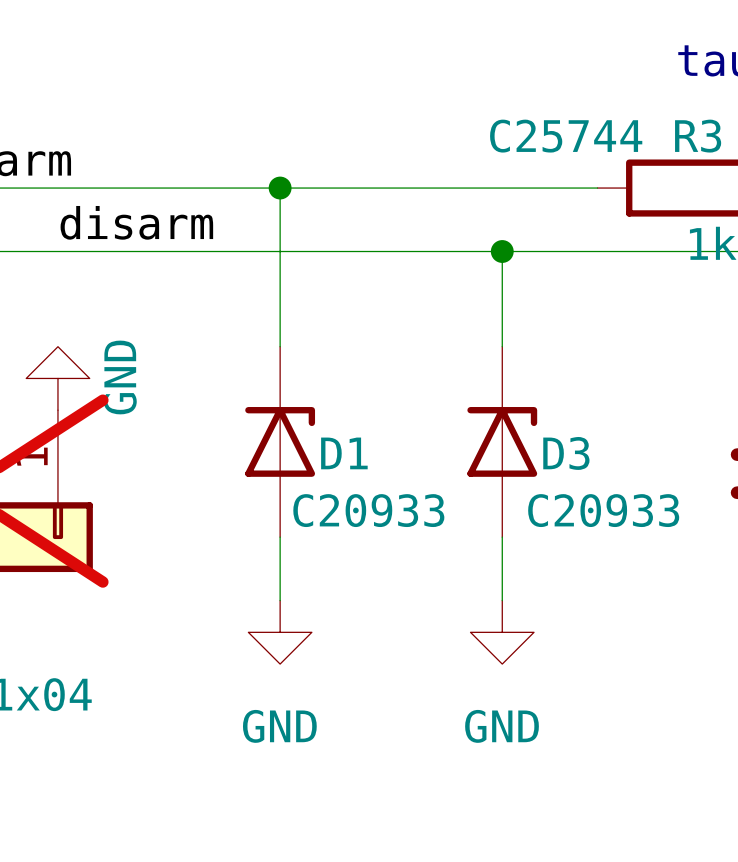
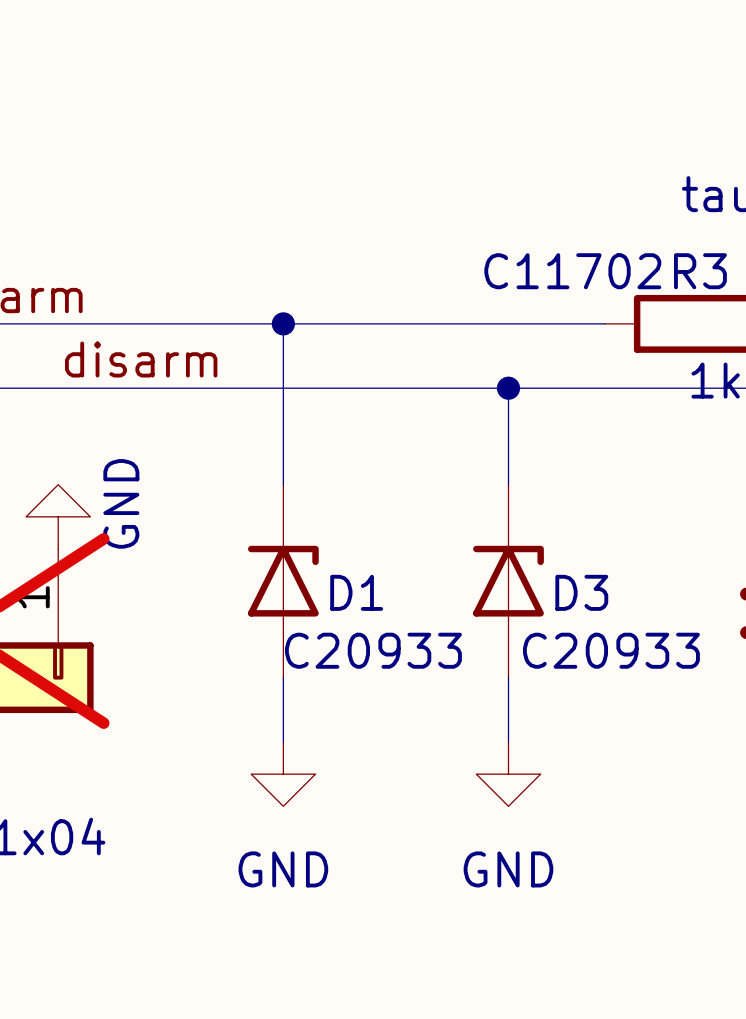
R3 text: C25744 (566, 136) -> C11702 (572, 271)

